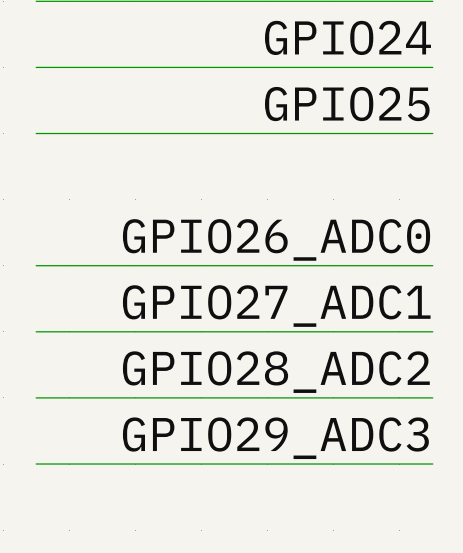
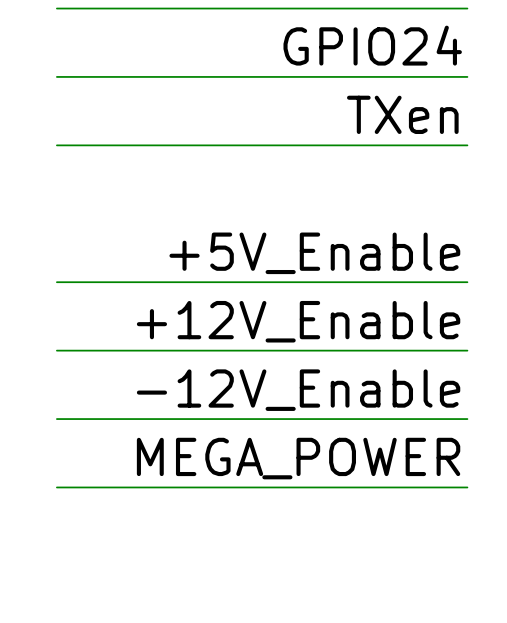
label: GPIO25 (347, 104) -> TXen (402, 114)
label: GPIO26_ADC0 (276, 239) -> +5V_Enable (314, 253)
label: GPIO27_ADC1 (276, 306) -> +12V_Enable (298, 321)
label: GPIO28_ADC2 (276, 372) -> -12V_Enable (298, 390)
label: GPIO29_ADC3 (275, 438) -> MEGA_POWER (298, 458)

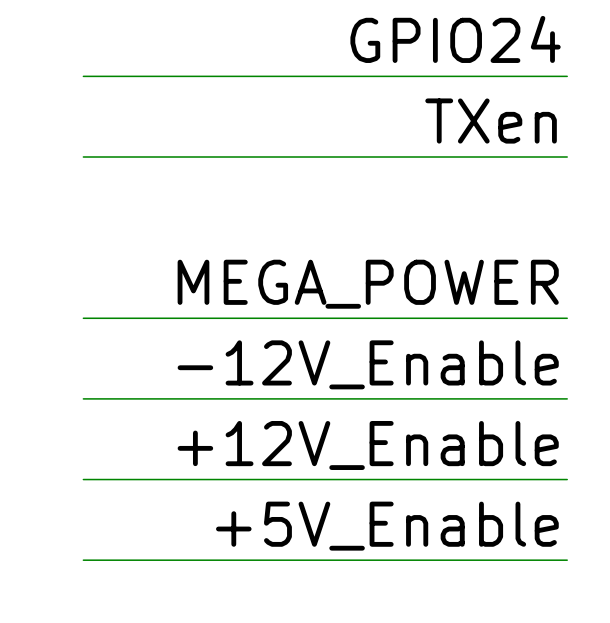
label: +5V_Enable (314, 253) -> MEGA_POWER (368, 284)
label: +12V_Enable (298, 321) -> -12V_Enable (368, 364)
label: -12V_Enable (298, 390) -> +12V_Enable (368, 445)
label: MEGA_POWER (298, 458) -> +5V_Enable (387, 526)

